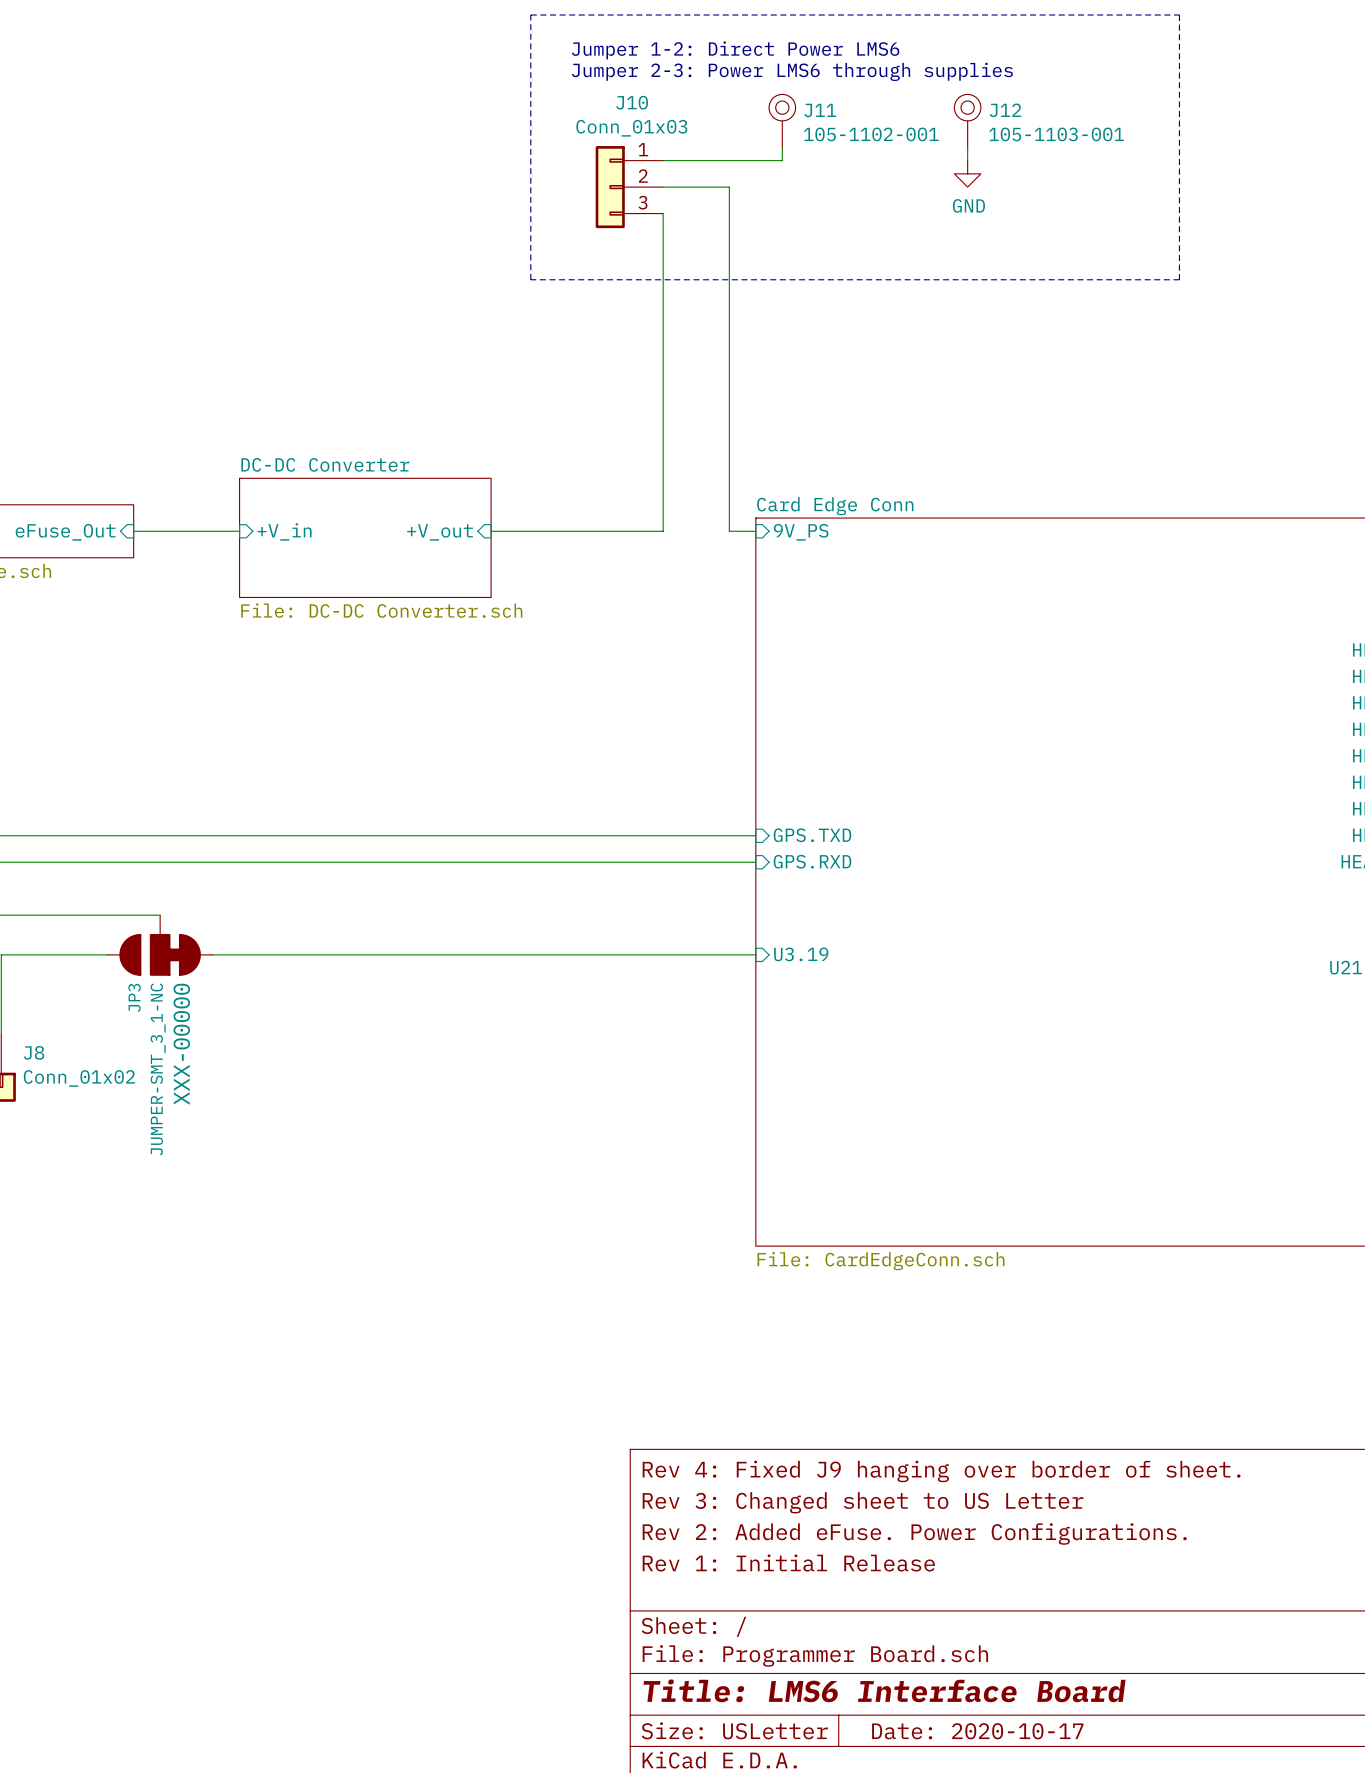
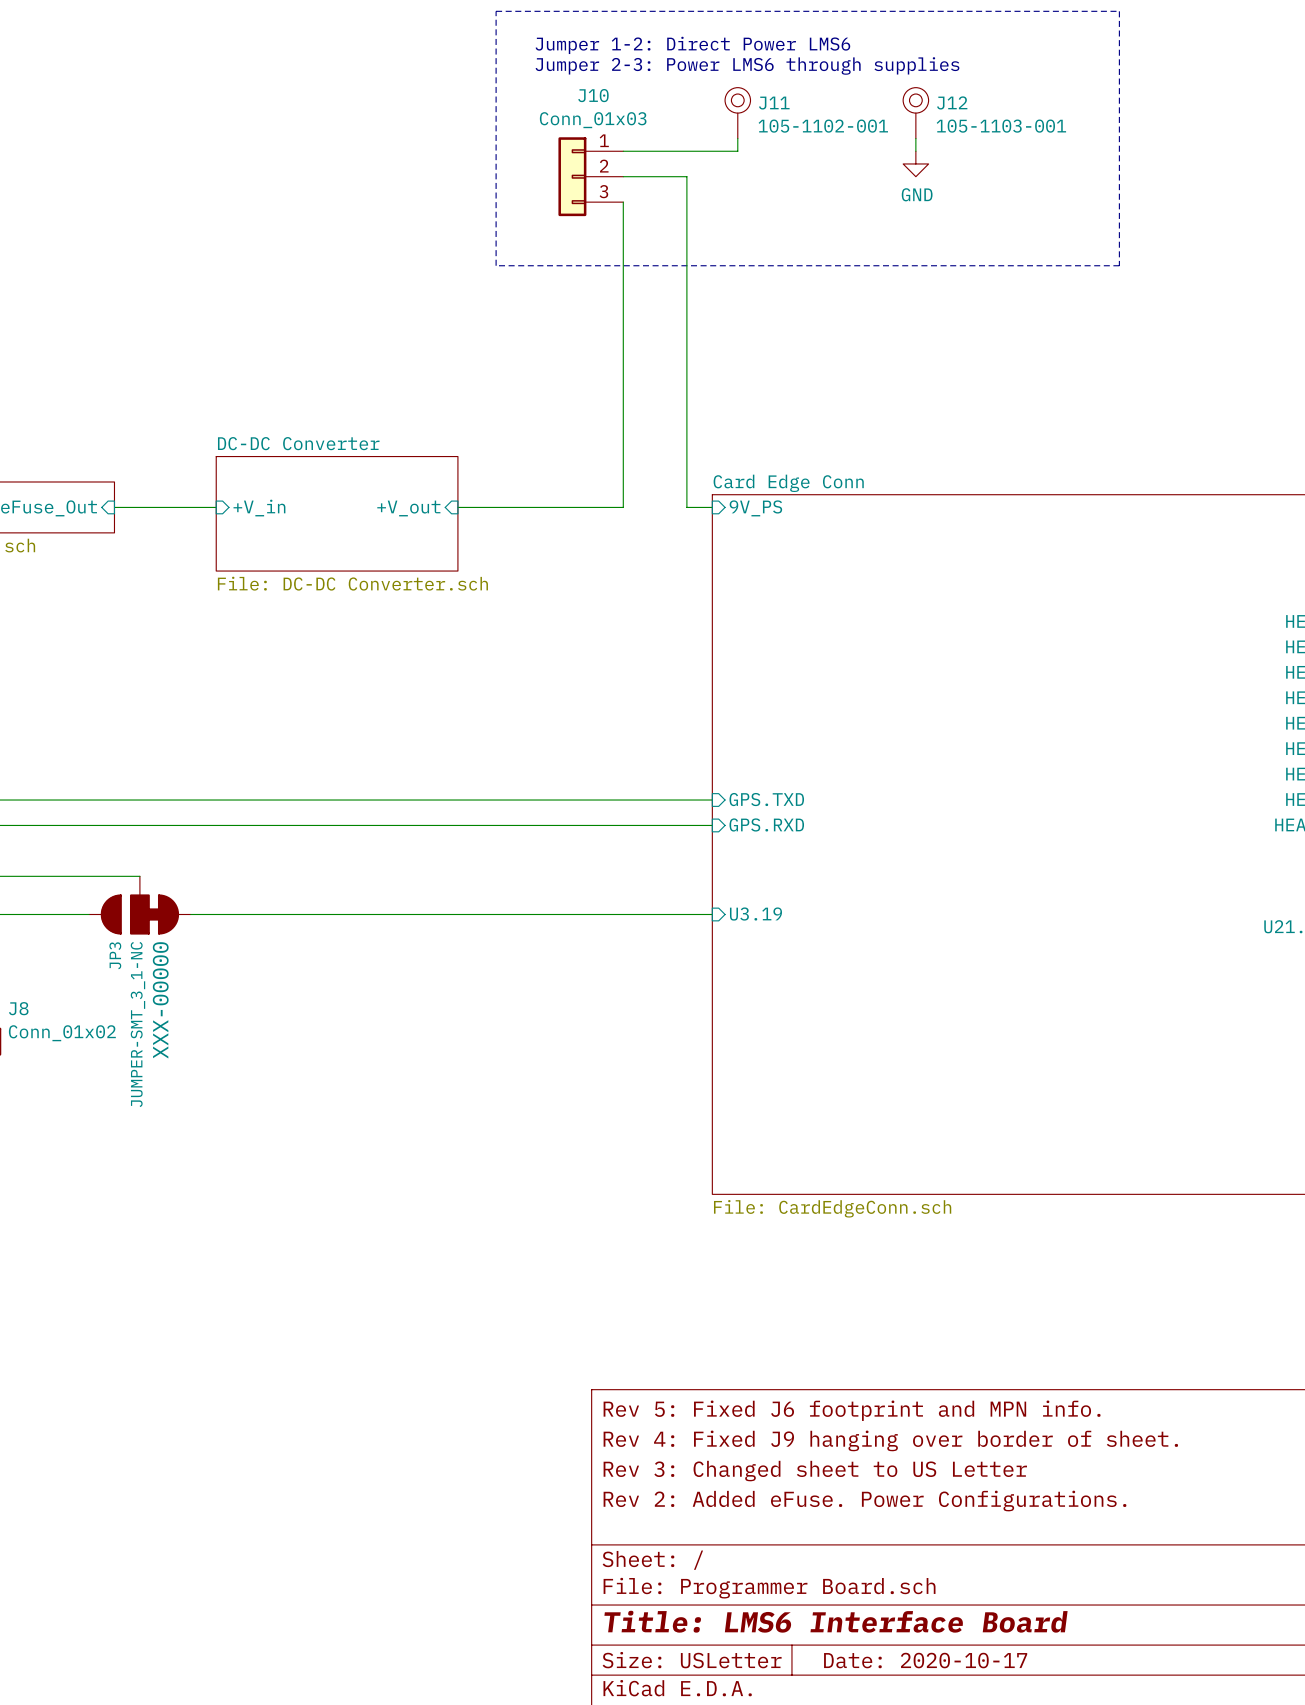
title block: Rev 4: Fixed J9 hanging over border of sheet. (941, 1471) -> Rev 5: Fixed J6 footprint and MPN info. (852, 1410)
title block: Rev 3: Changed sheet to US Letter (862, 1502) -> Rev 4: Fixed J9 hanging over border of sheet. (890, 1440)
title block: Rev 2: Added eFuse. Power Configurations. (914, 1533) -> Rev 3: Changed sheet to US Letter (815, 1471)
title block: Rev 1: Initial Release (788, 1563) -> Rev 2: Added eFuse. Power Configurations. (864, 1501)

